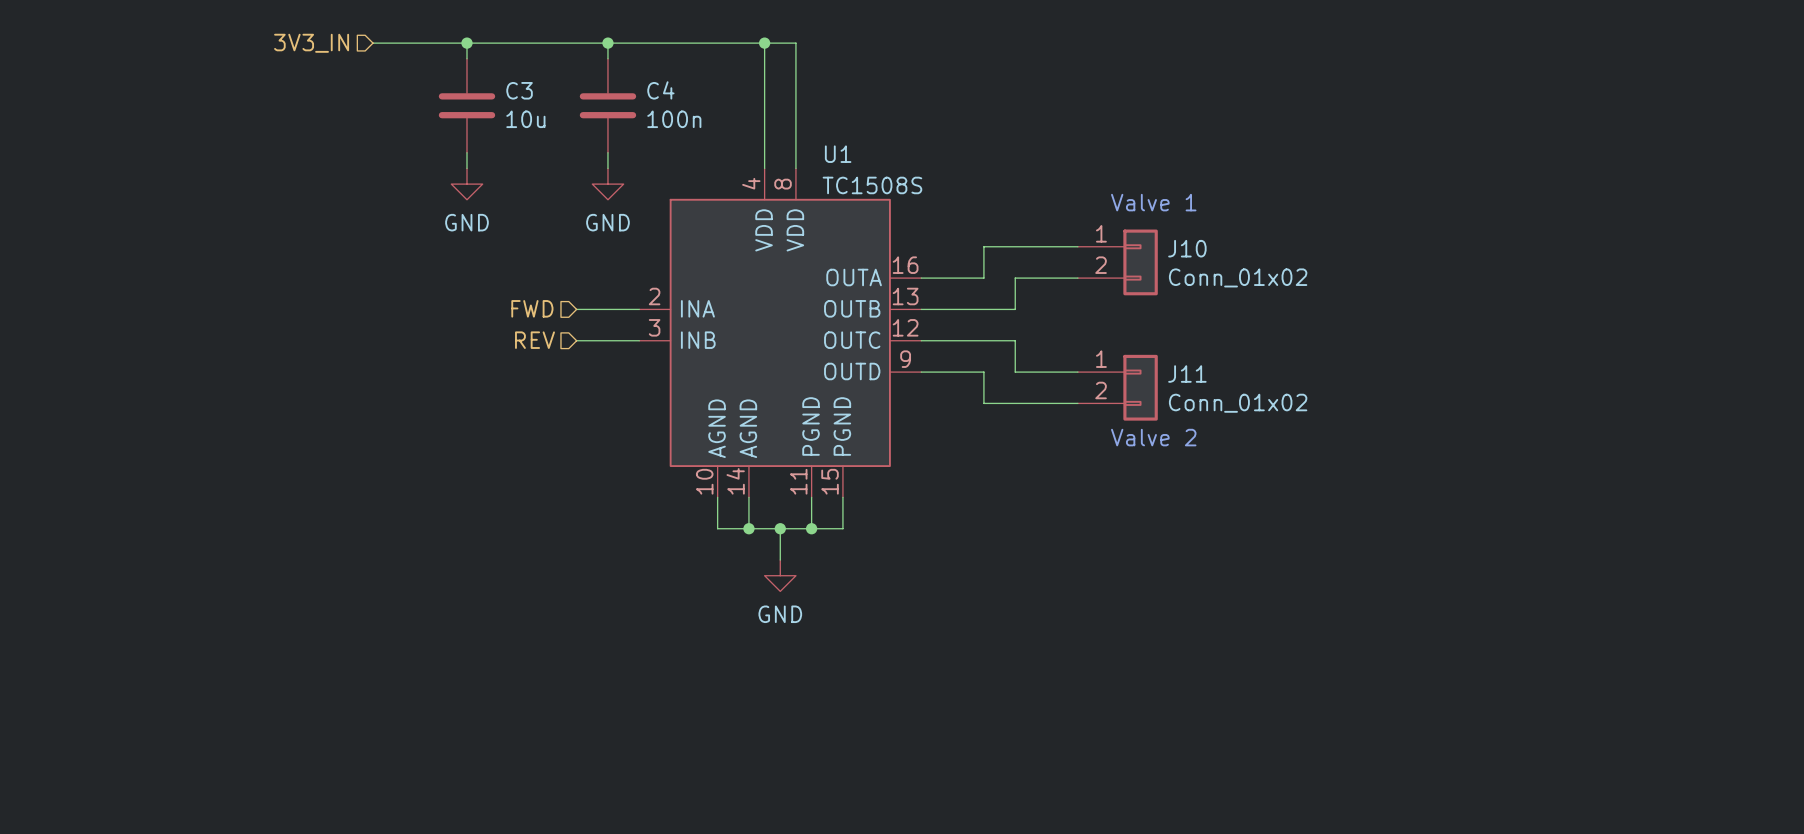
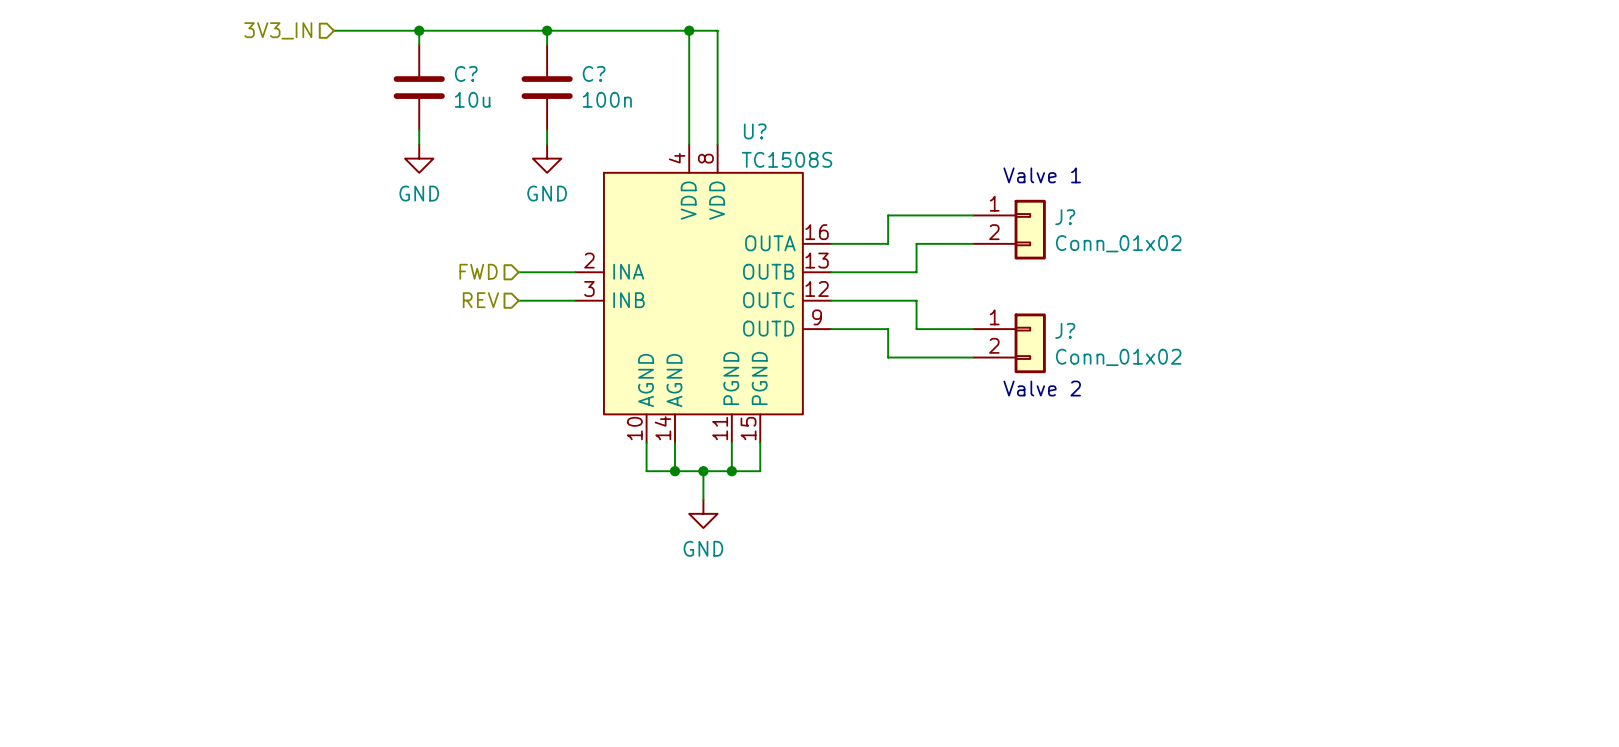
C3 name: C3 (519, 90) -> C? (466, 73)
C4 name: C4 (660, 90) -> C? (594, 73)
U1 name: U1 (838, 154) -> U? (755, 131)
J10 name: J10 (1187, 248) -> J? (1065, 217)
J11 name: J11 (1187, 374) -> J? (1065, 330)

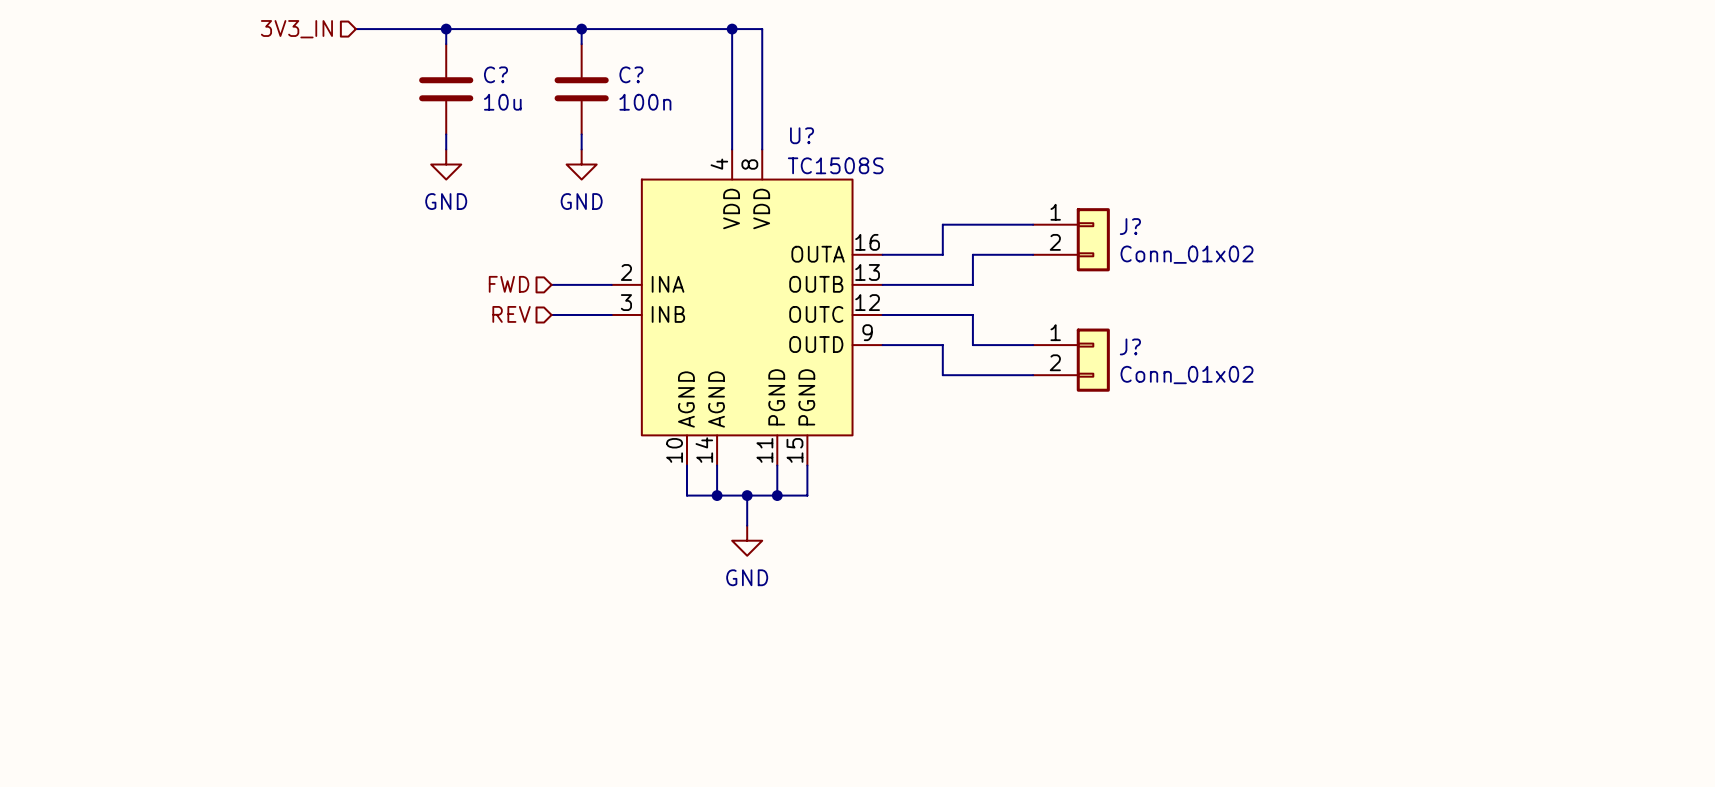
text: Valve 1 (1042, 175) -> none
text: Valve 2 (1042, 388) -> none

